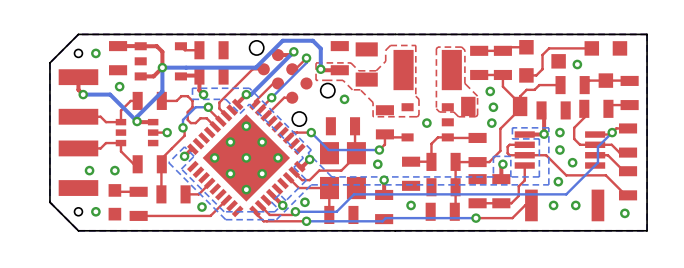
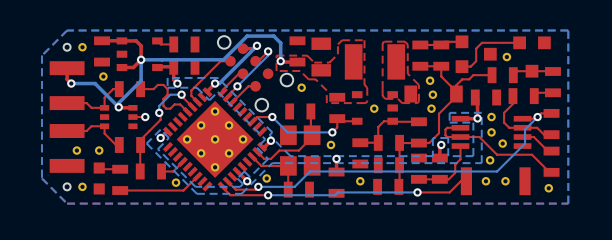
board edge: (647, 34) (78, 34) (49, 62) (49, 202) (78, 230) (647, 230) (647, 34) -> none

